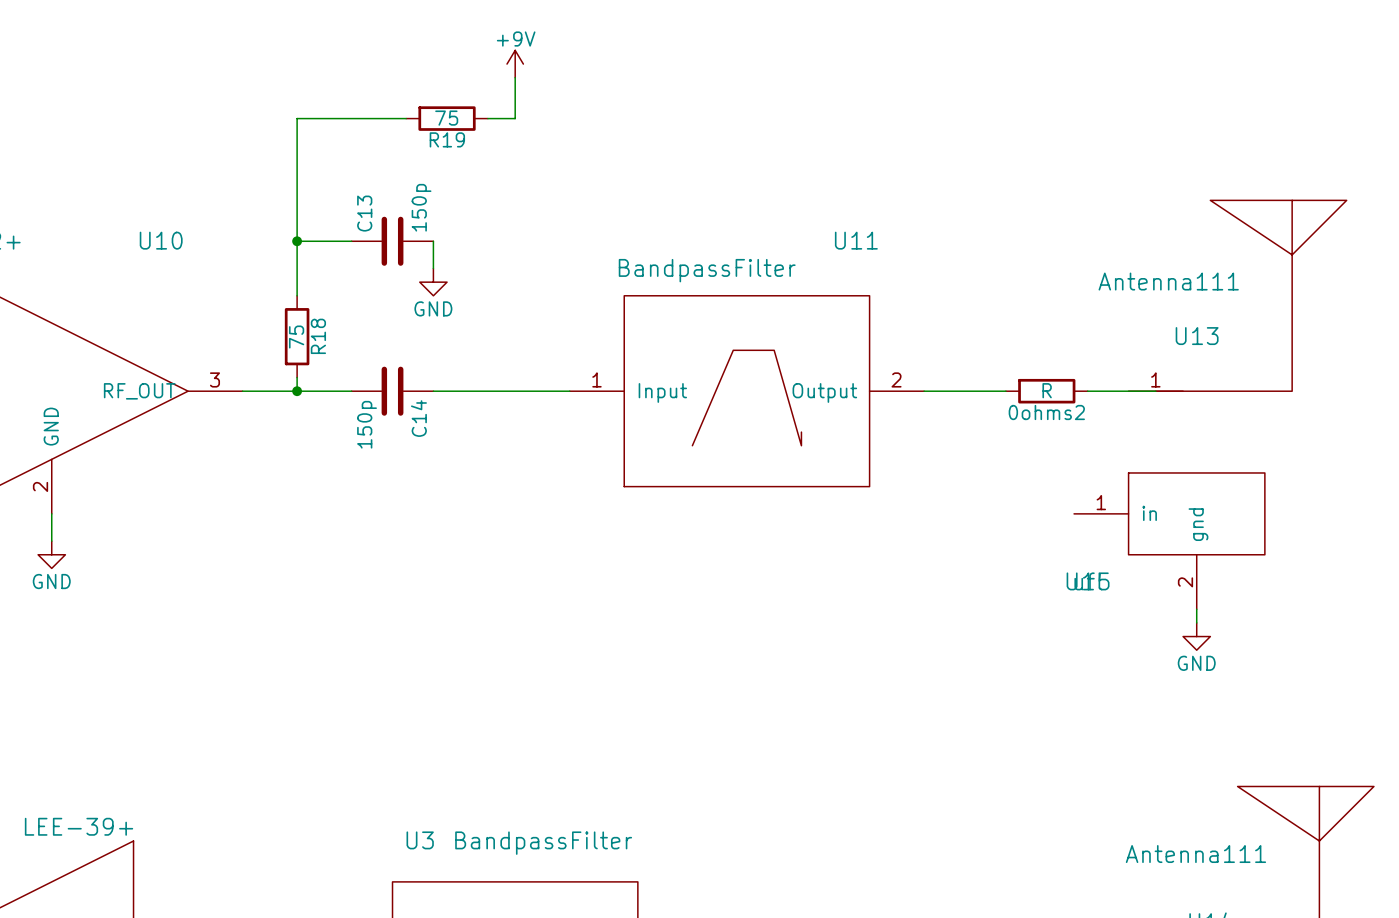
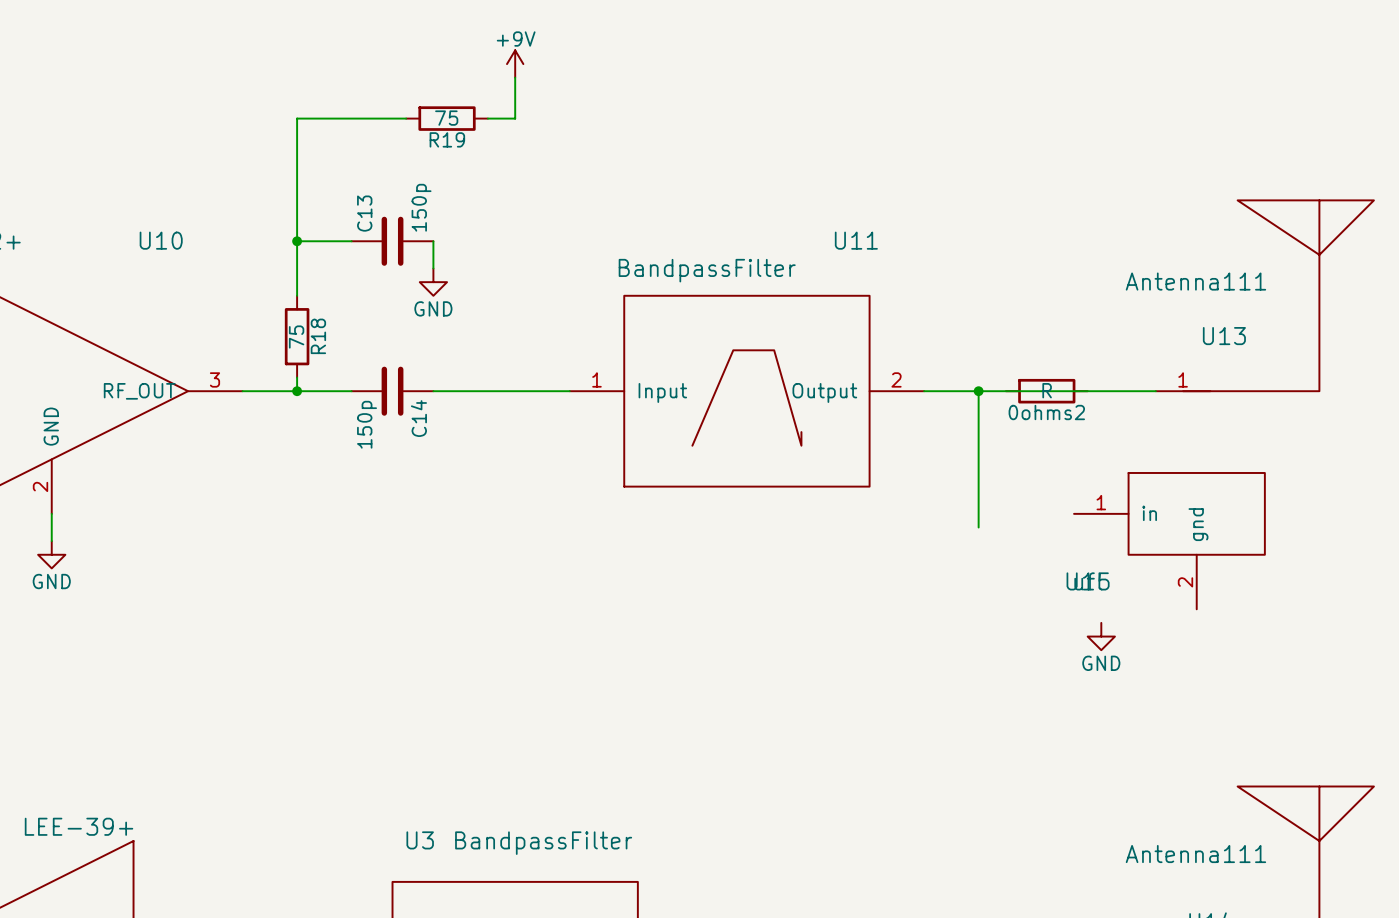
U13 position: (1237, 295) -> (1264, 295)
wire: none -> (978, 391) (978, 527)
junction: none -> (978, 391)
wire: none -> (1005, 391) (1087, 391)
wire: (1196, 609) (1196, 622) -> none
power symbol position: GND (1196, 636) -> GND (1101, 636)

